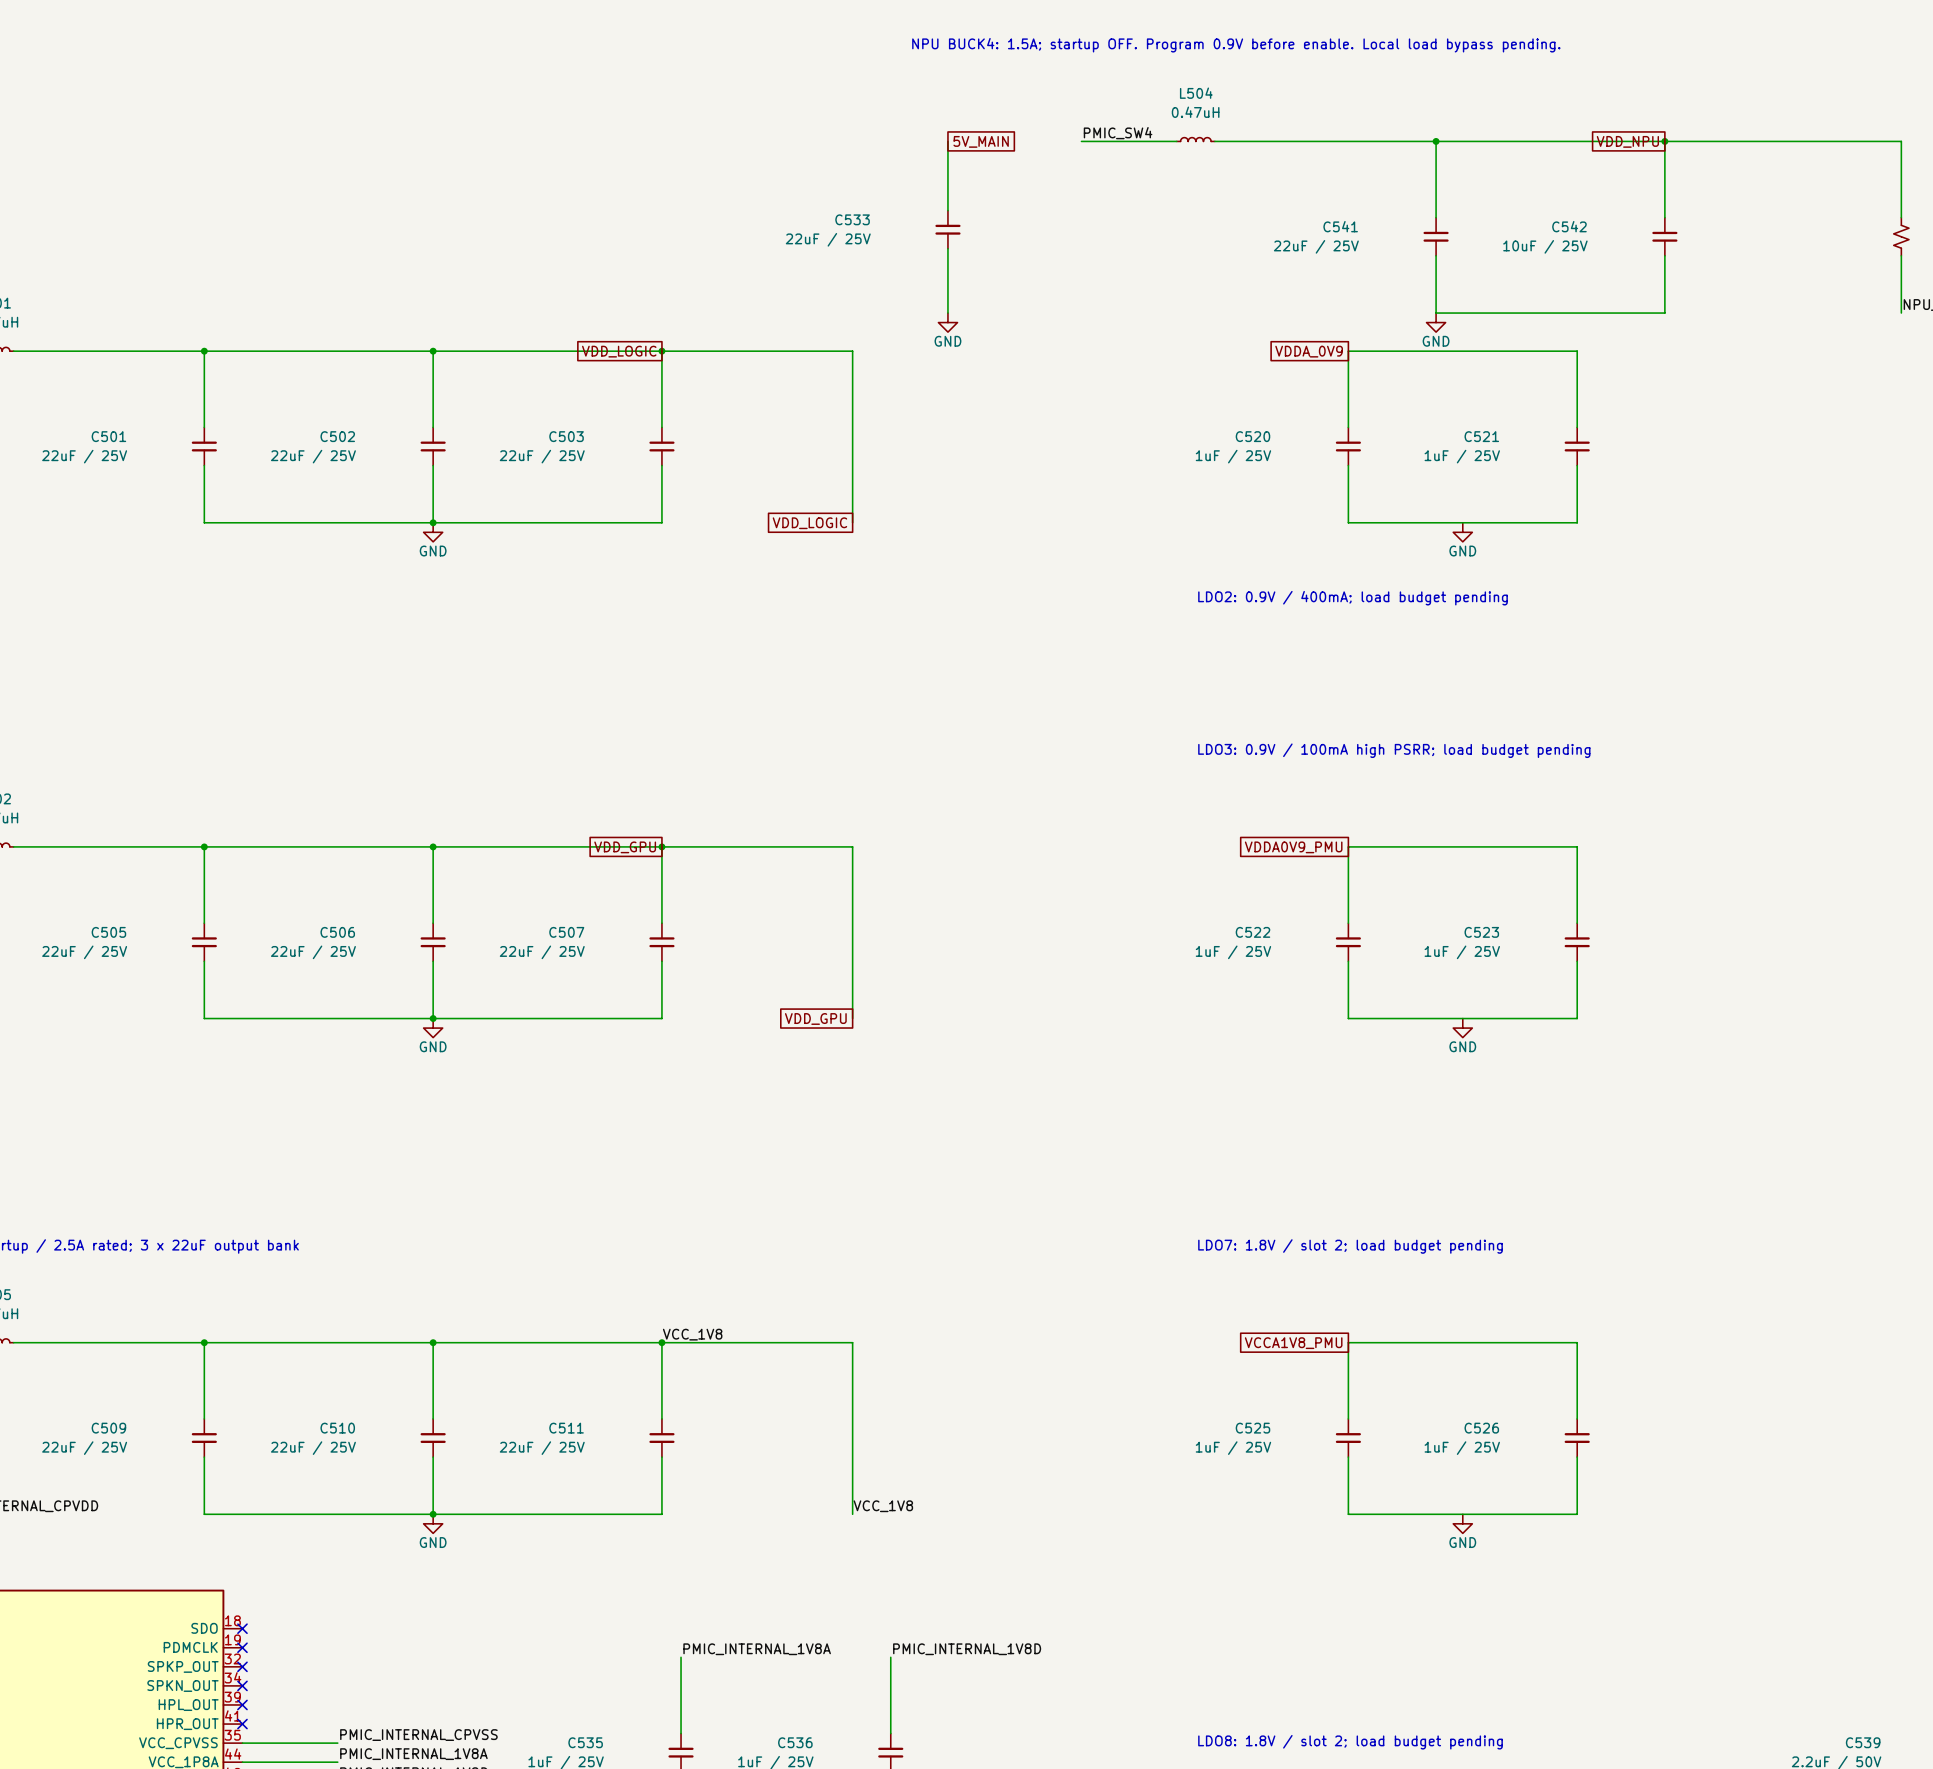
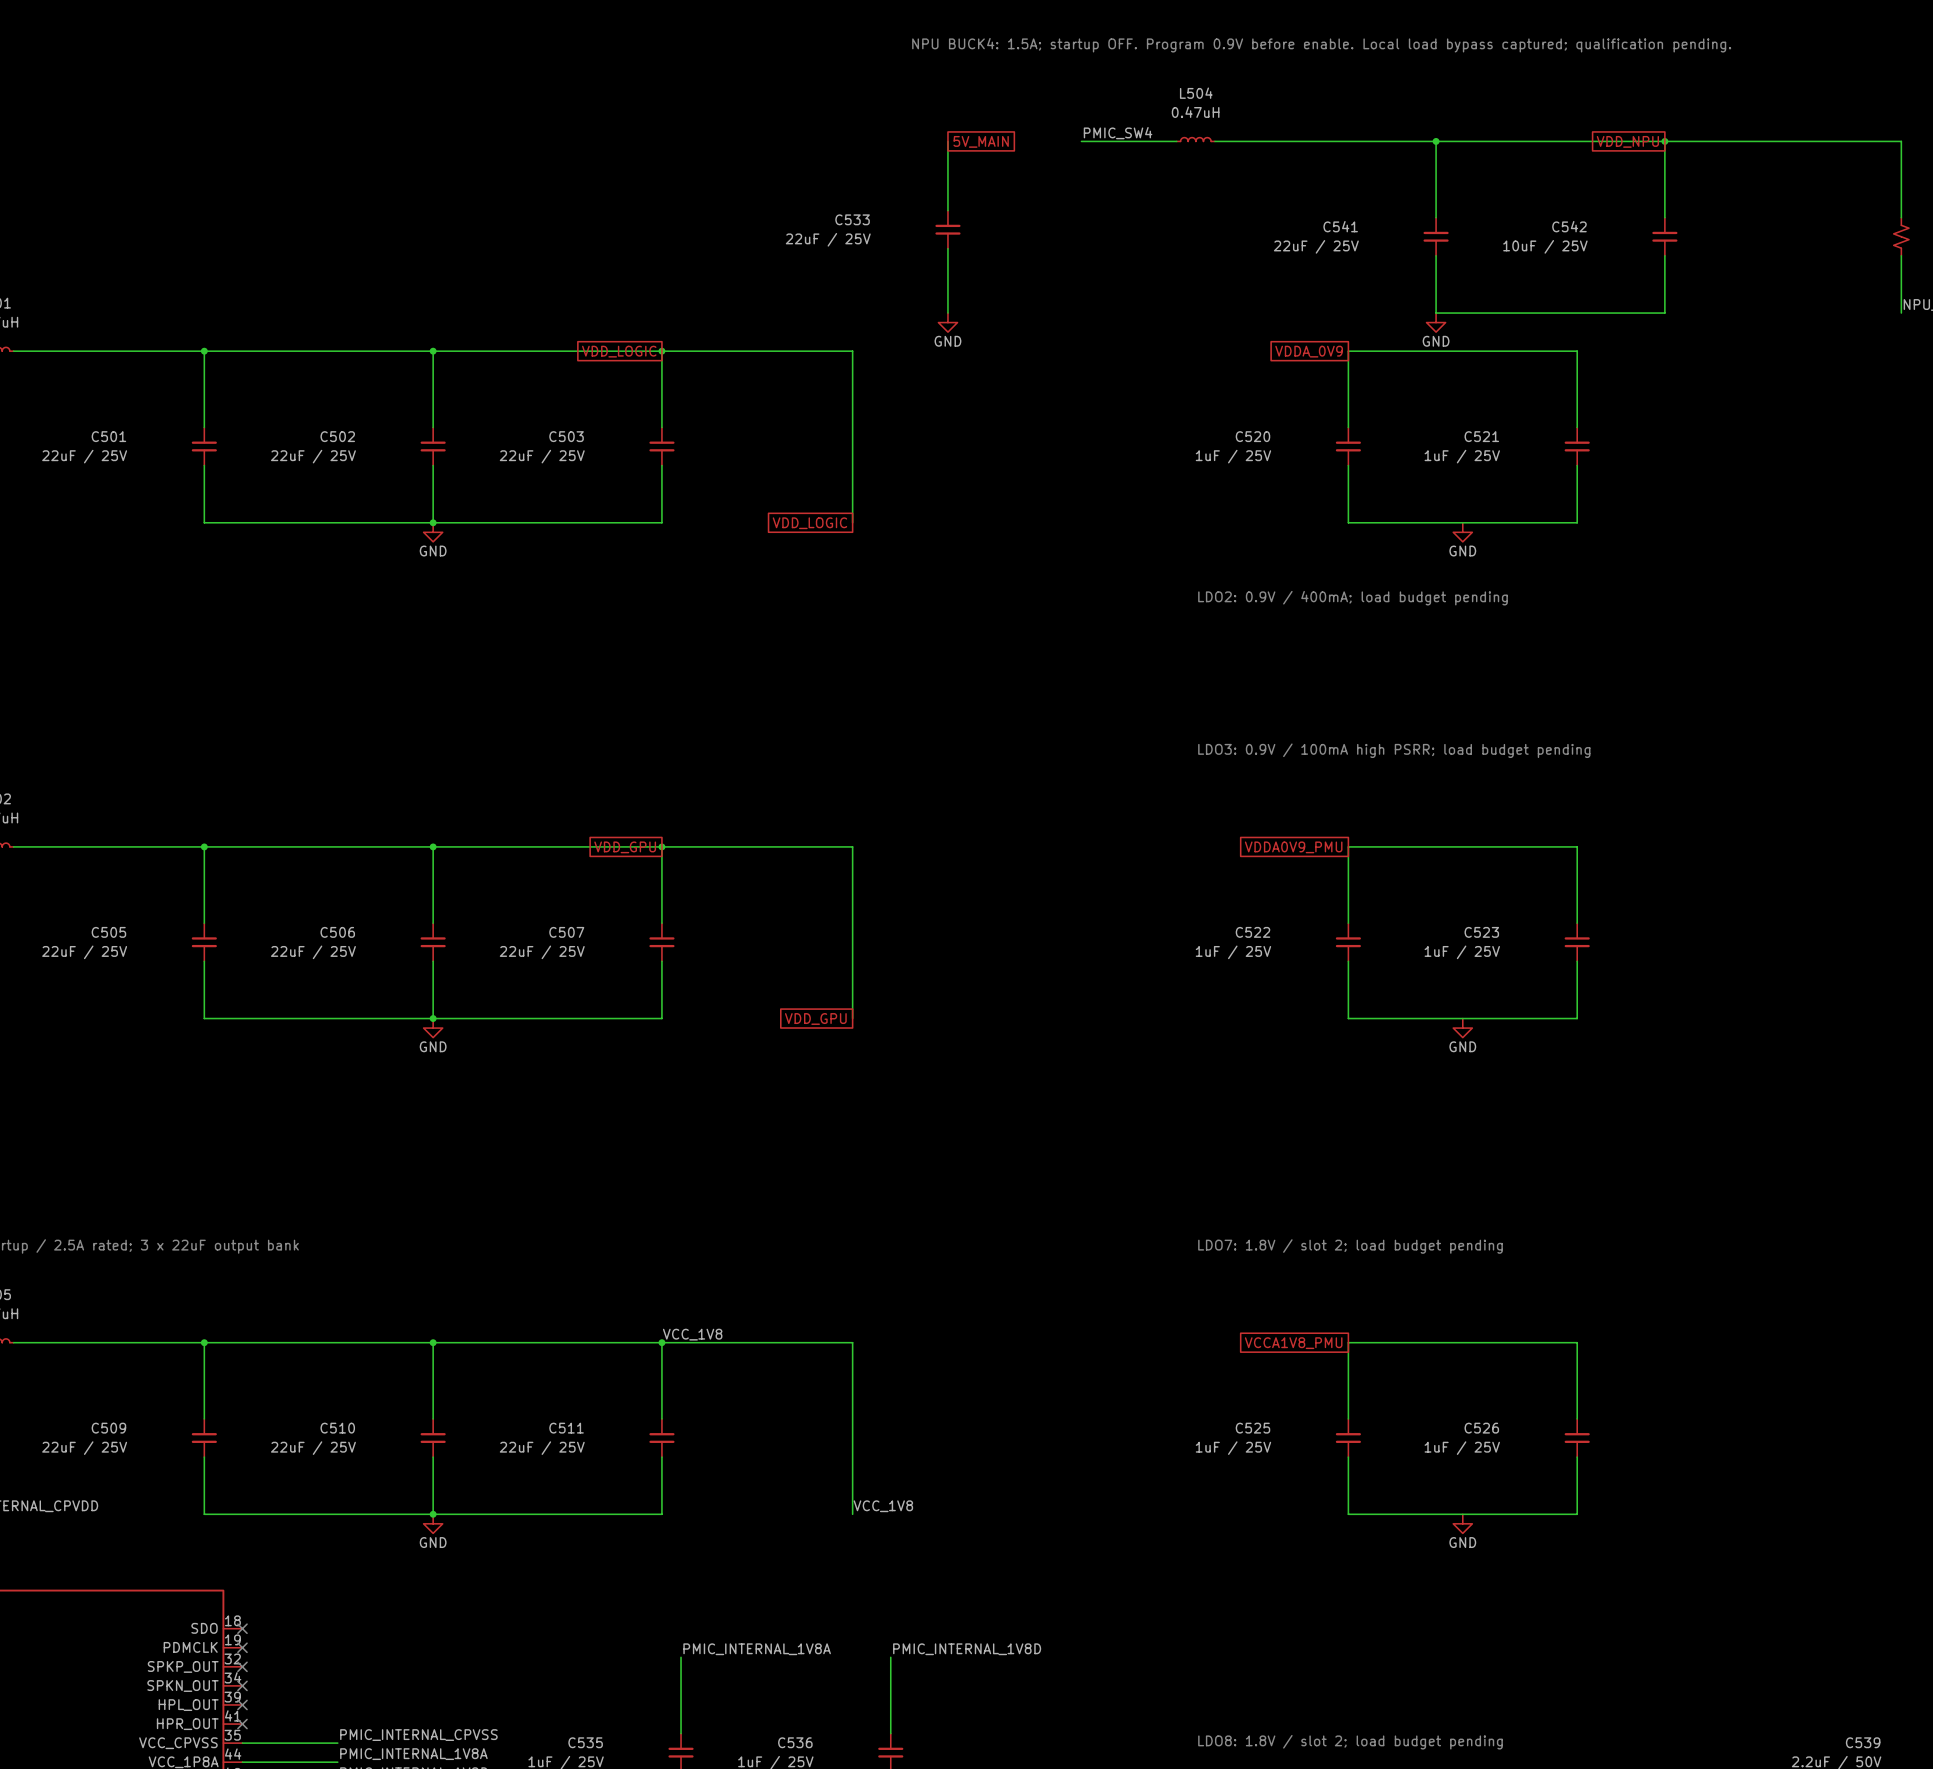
text: NPU BUCK4: 1.5A; startup OFF. Program 0.9V before enable. Local load bypass pending. (1236, 45) -> NPU BUCK4: 1.5A; startup OFF. Program 0.9V before enable. Local load bypass captured; qualification pending. (1321, 45)

